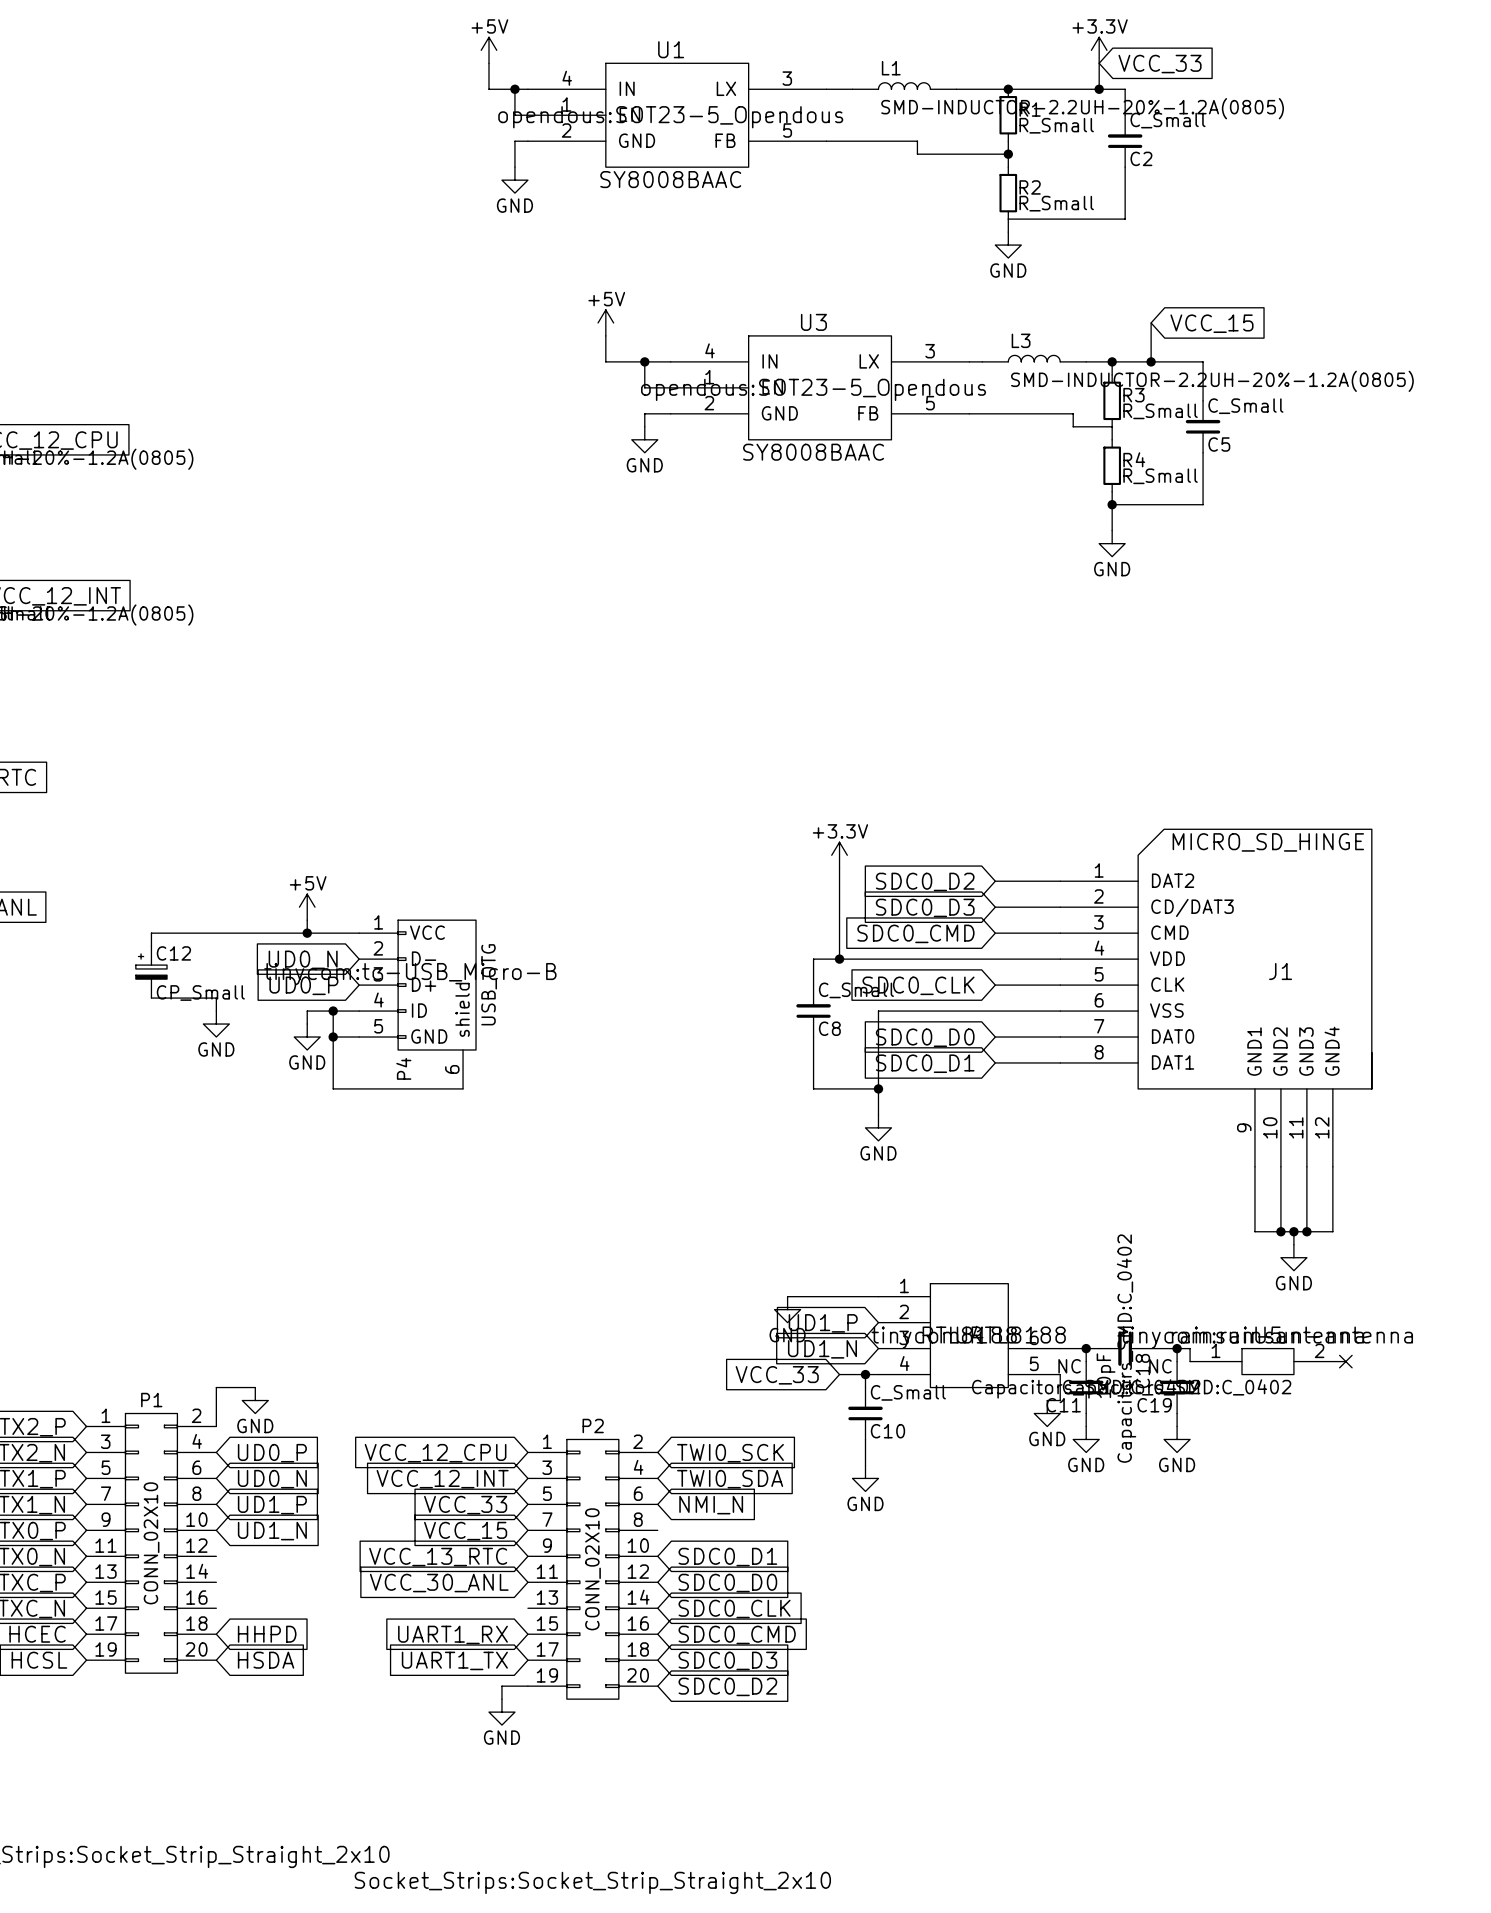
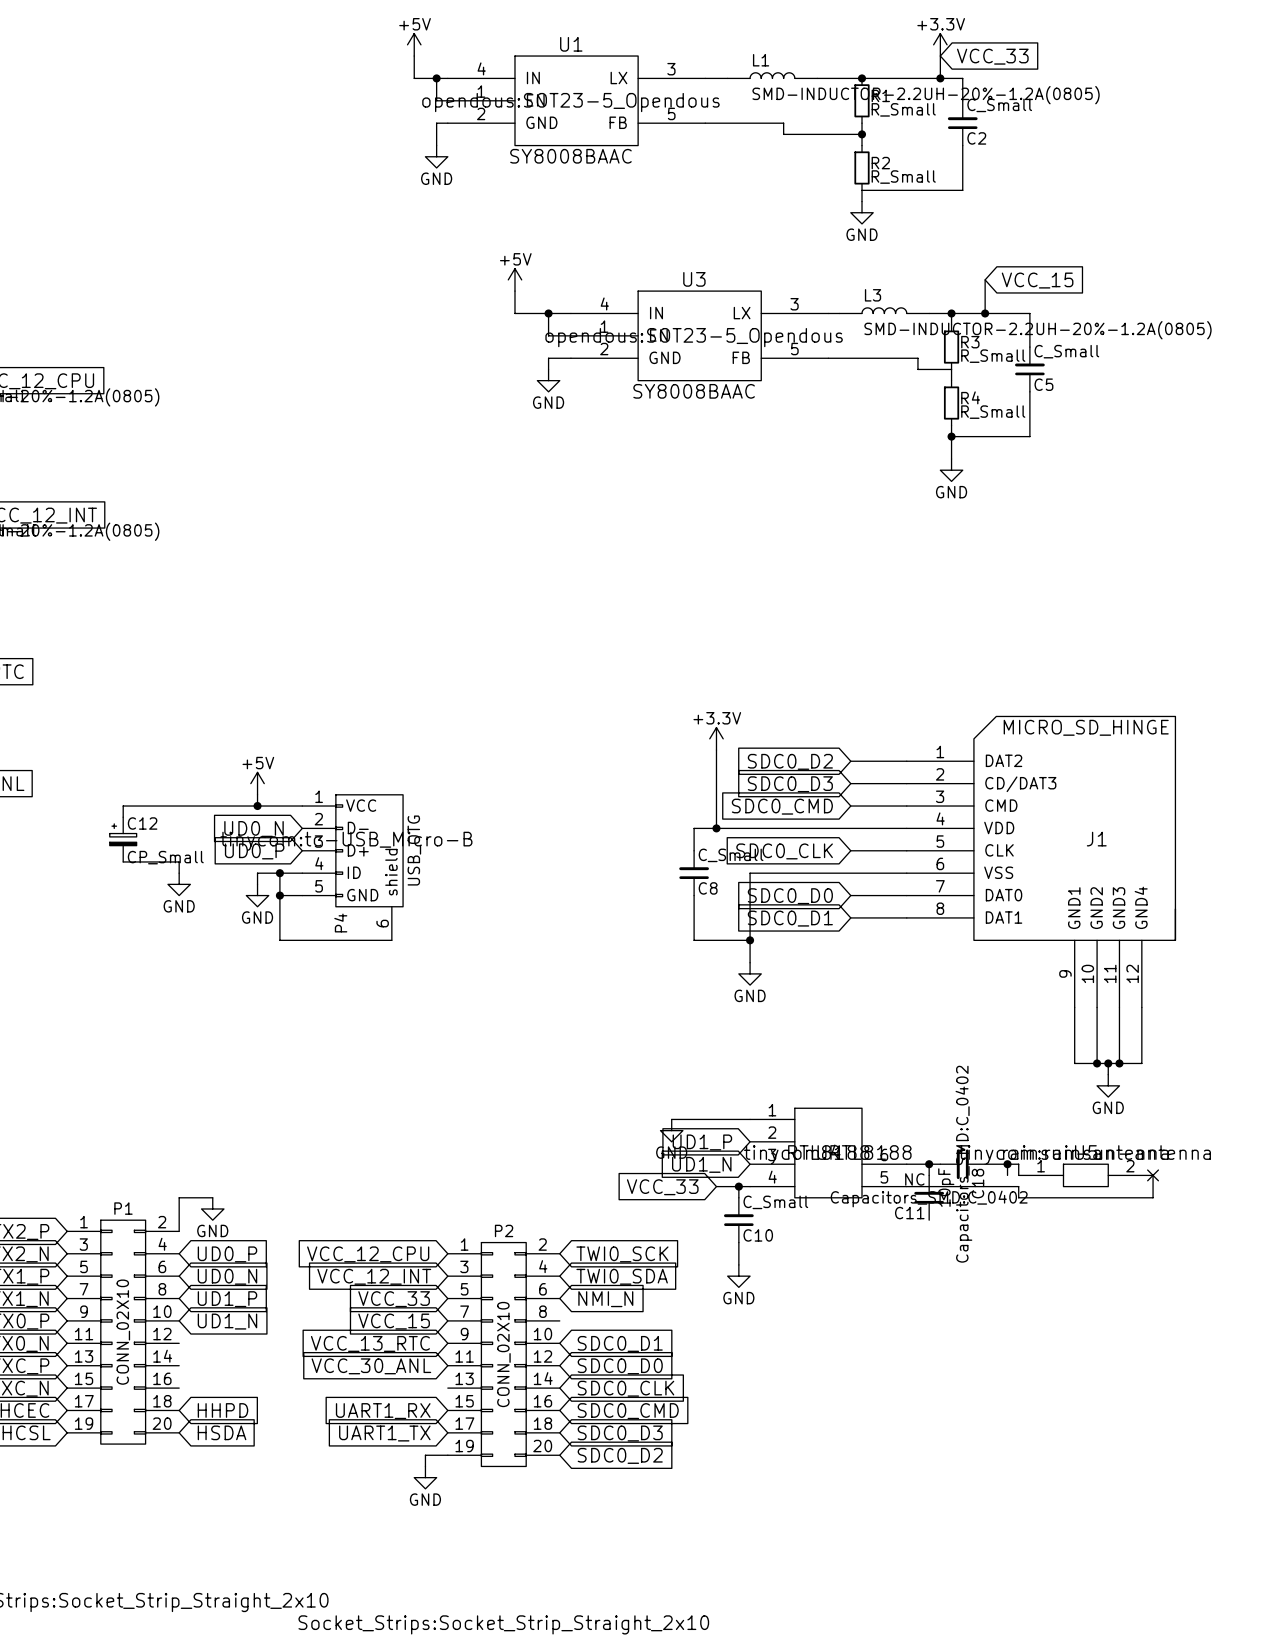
wire: (1060, 1374) (1060, 1400) (1047, 1400) -> (906, 1186) (1018, 1186) (1018, 1197) (1153, 1197) (1153, 1175)
C19: NC (1177, 1387) -> none
power symbol: GND (1047, 1413) -> none
wire: (1086, 1413) (1086, 1426) -> none
wire: (1177, 1413) (1177, 1426) -> none
power symbol: GND (1086, 1439) -> none
power symbol: GND (1177, 1439) -> none

